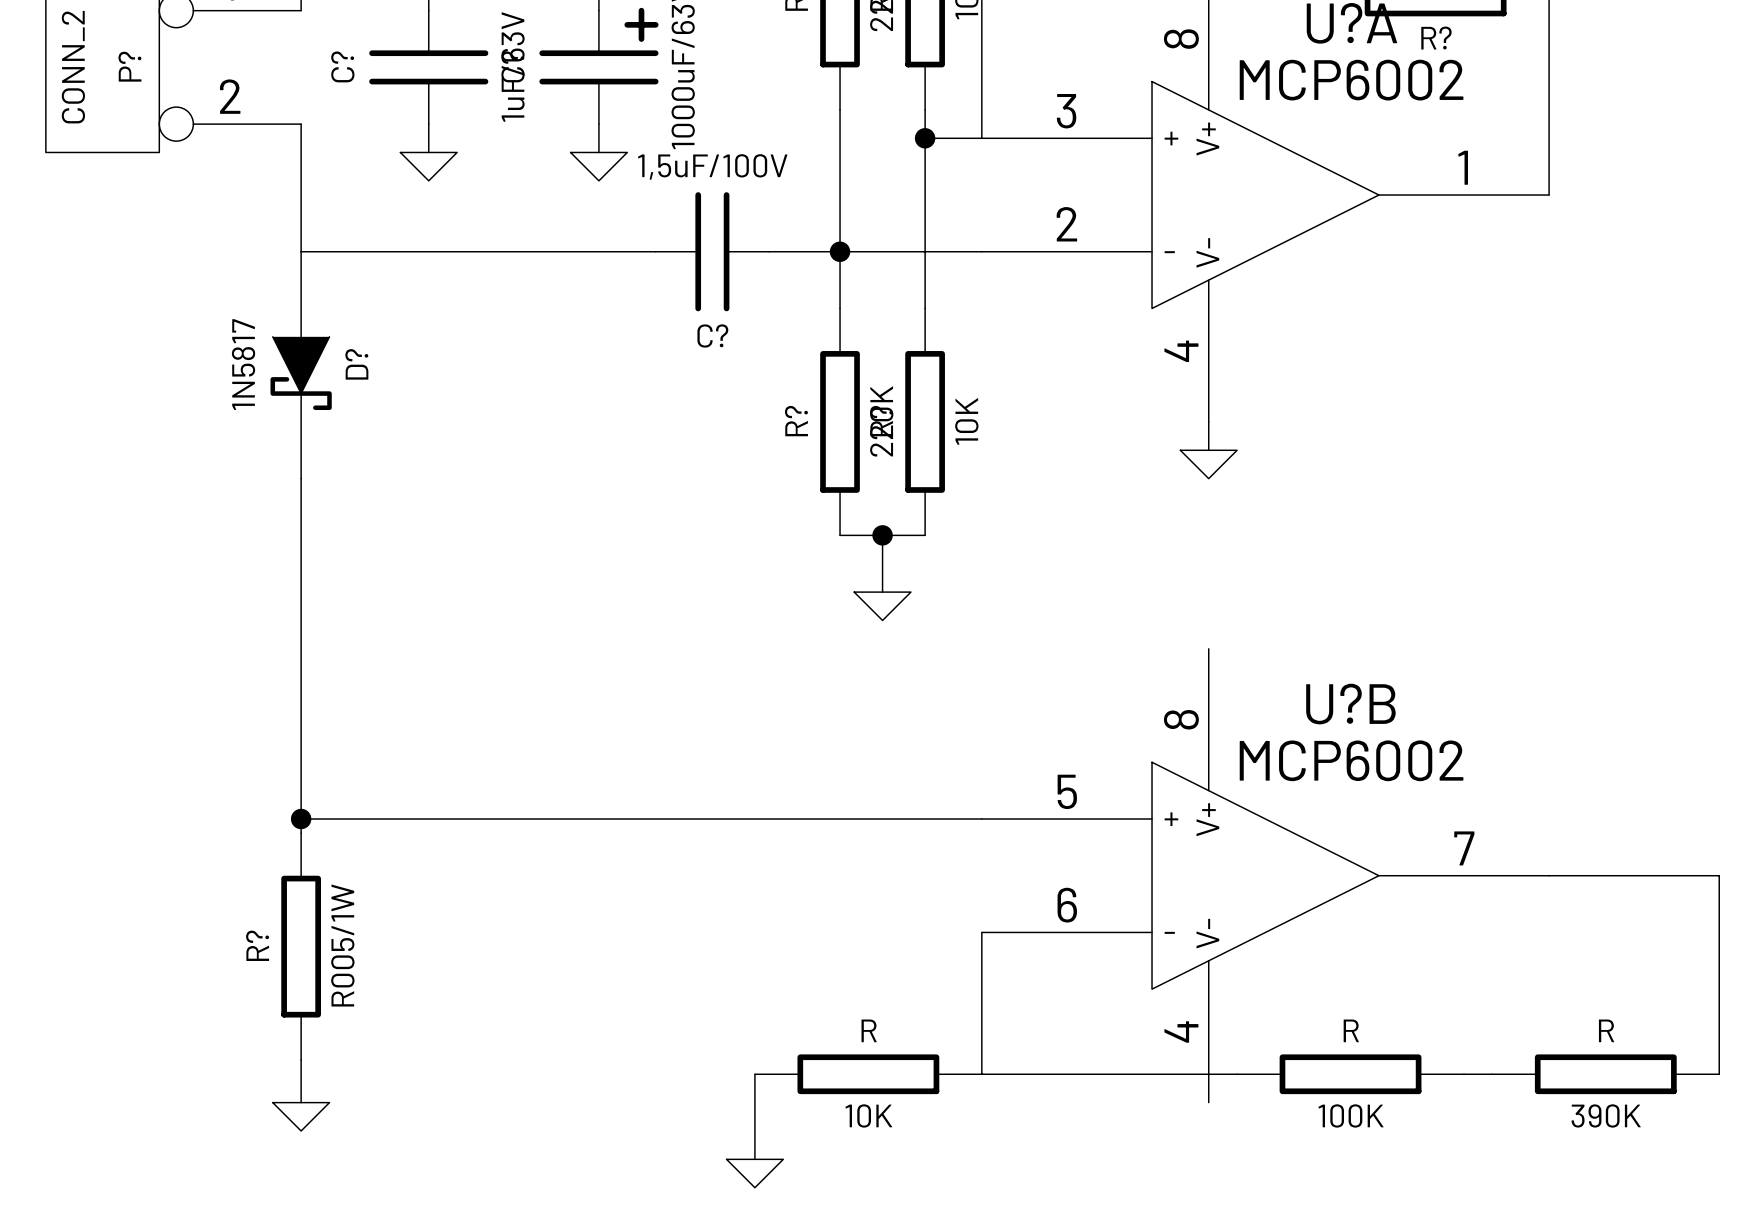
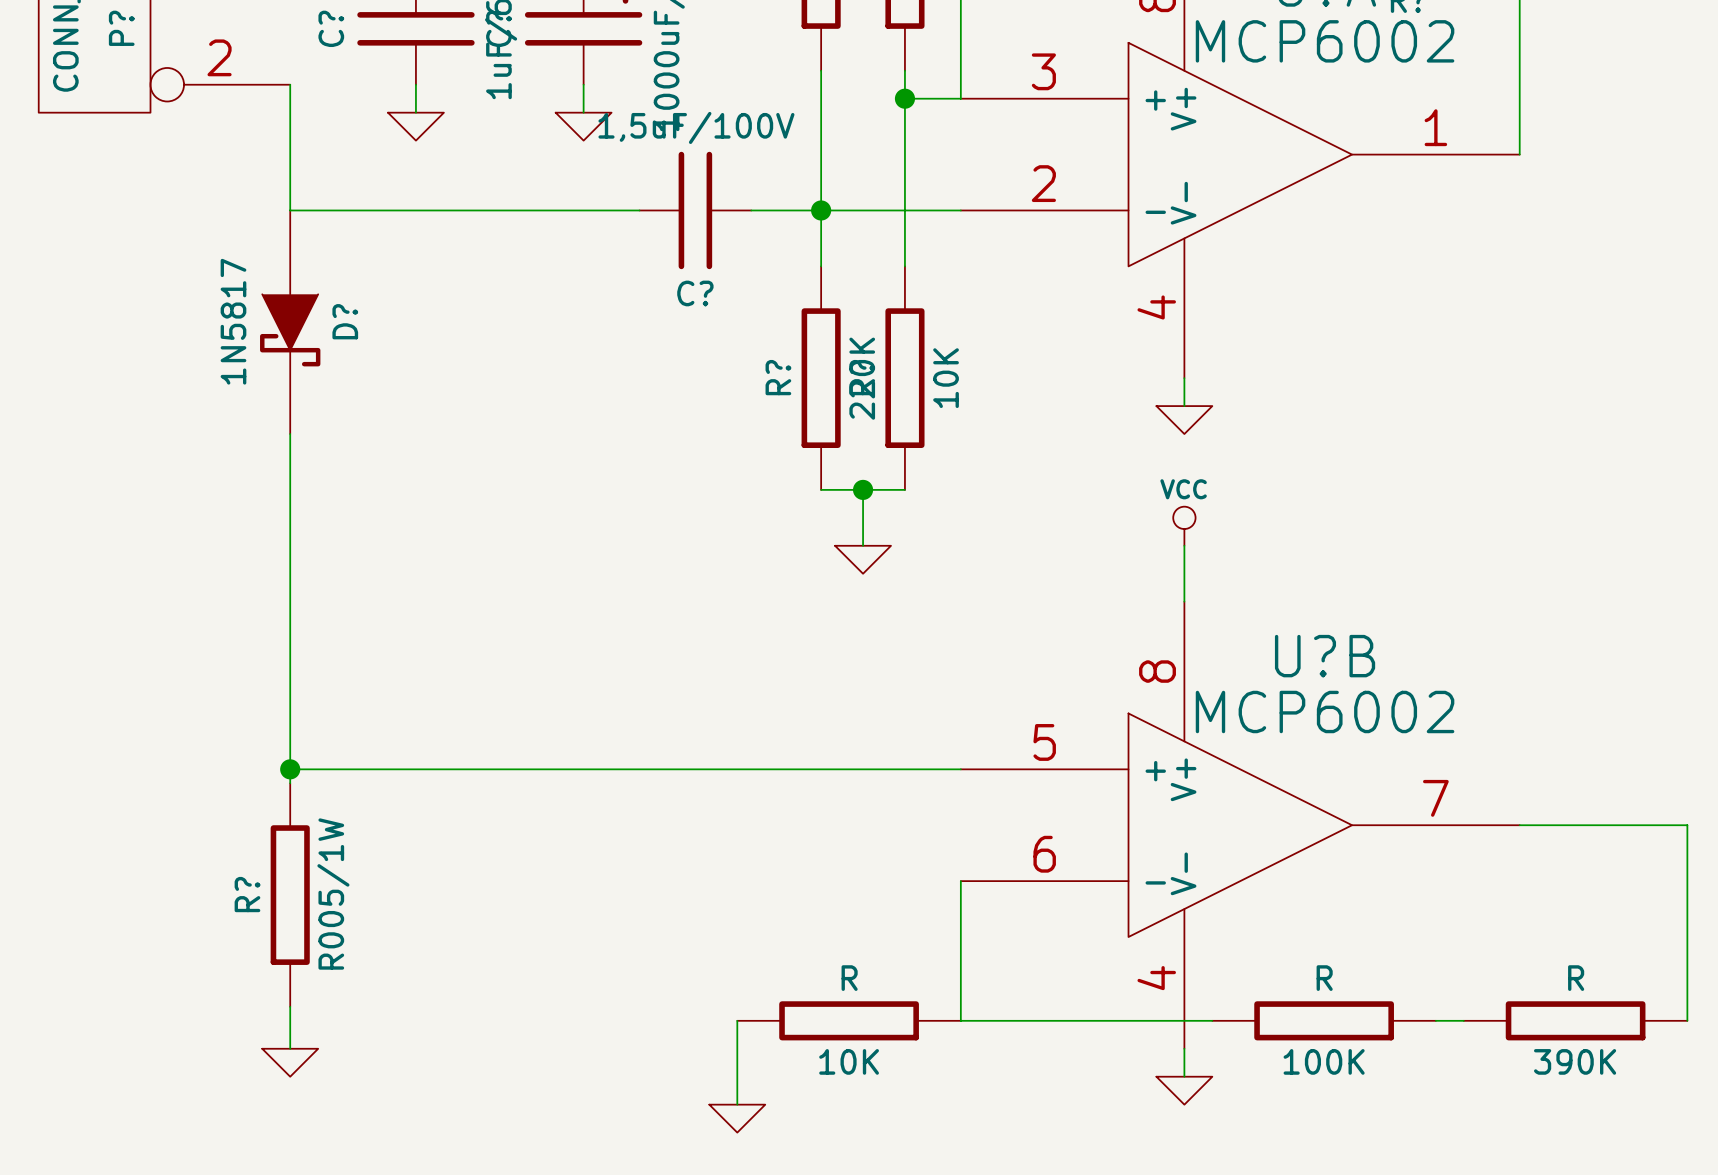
power symbol: none -> VCC (1184, 526)
wire: none -> (1184, 545) (1184, 601)
wire: none -> (1184, 1048) (1184, 1076)
power symbol: none -> (1184, 1090)

